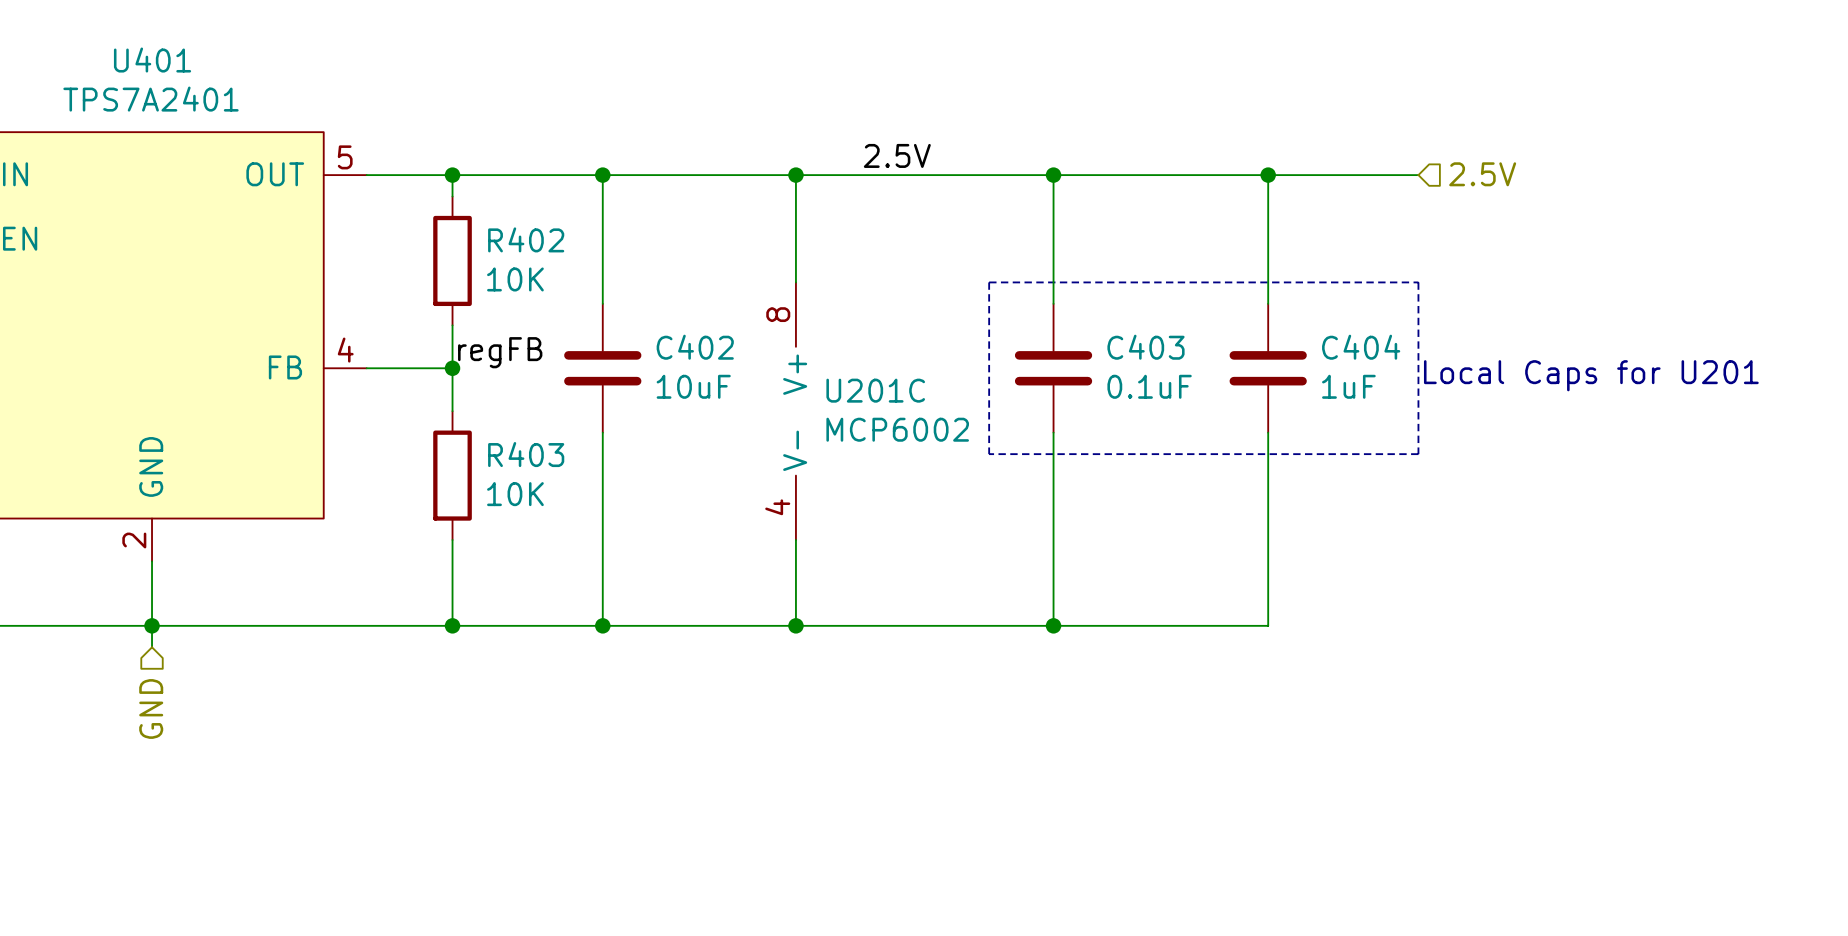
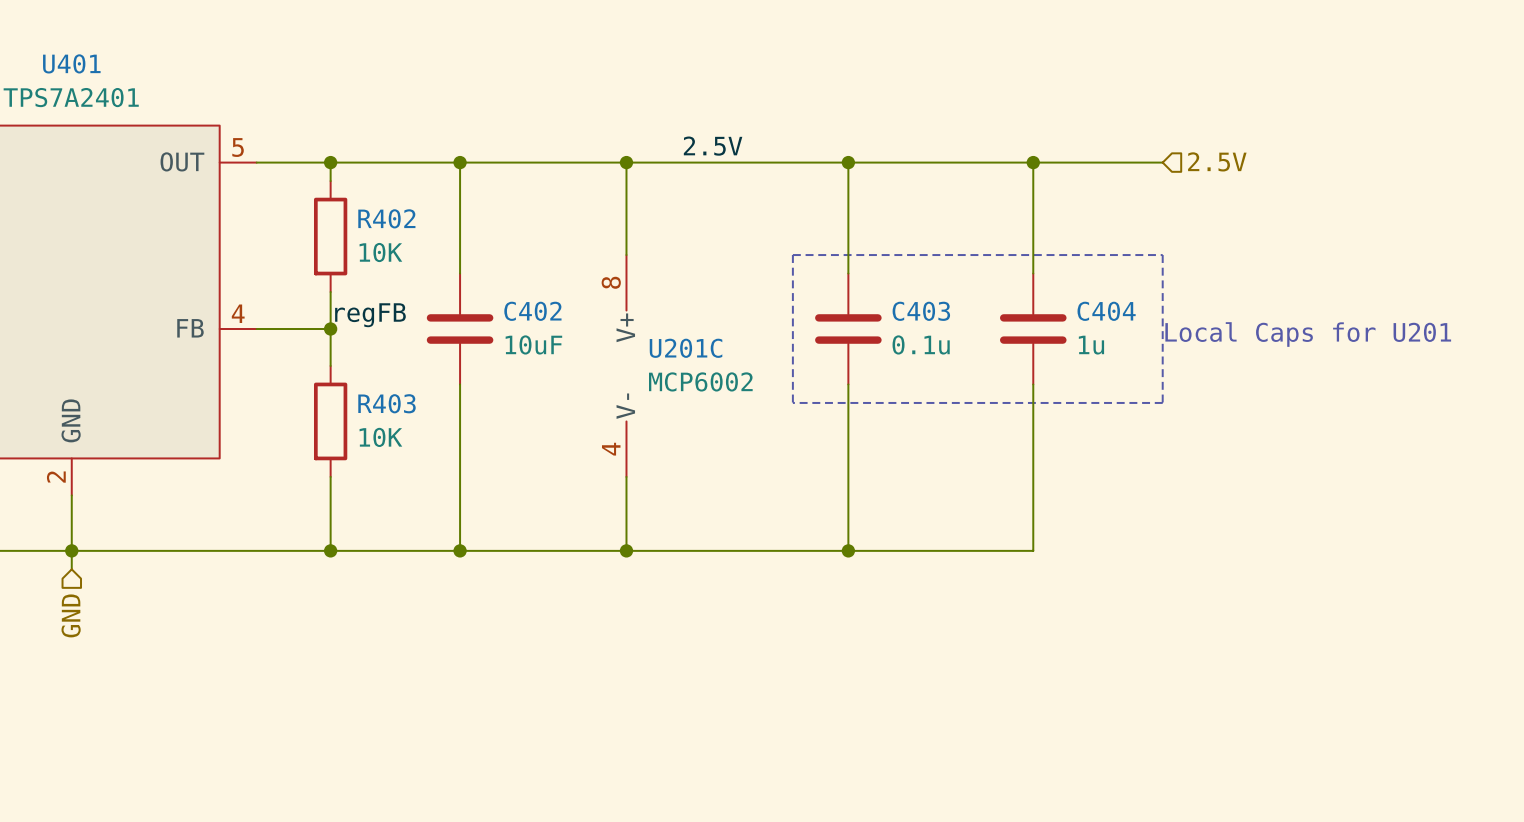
C403 value: 0.1uF (1149, 386) -> 0.1u (921, 344)
C404 value: 1uF (1348, 386) -> 1u (1091, 345)

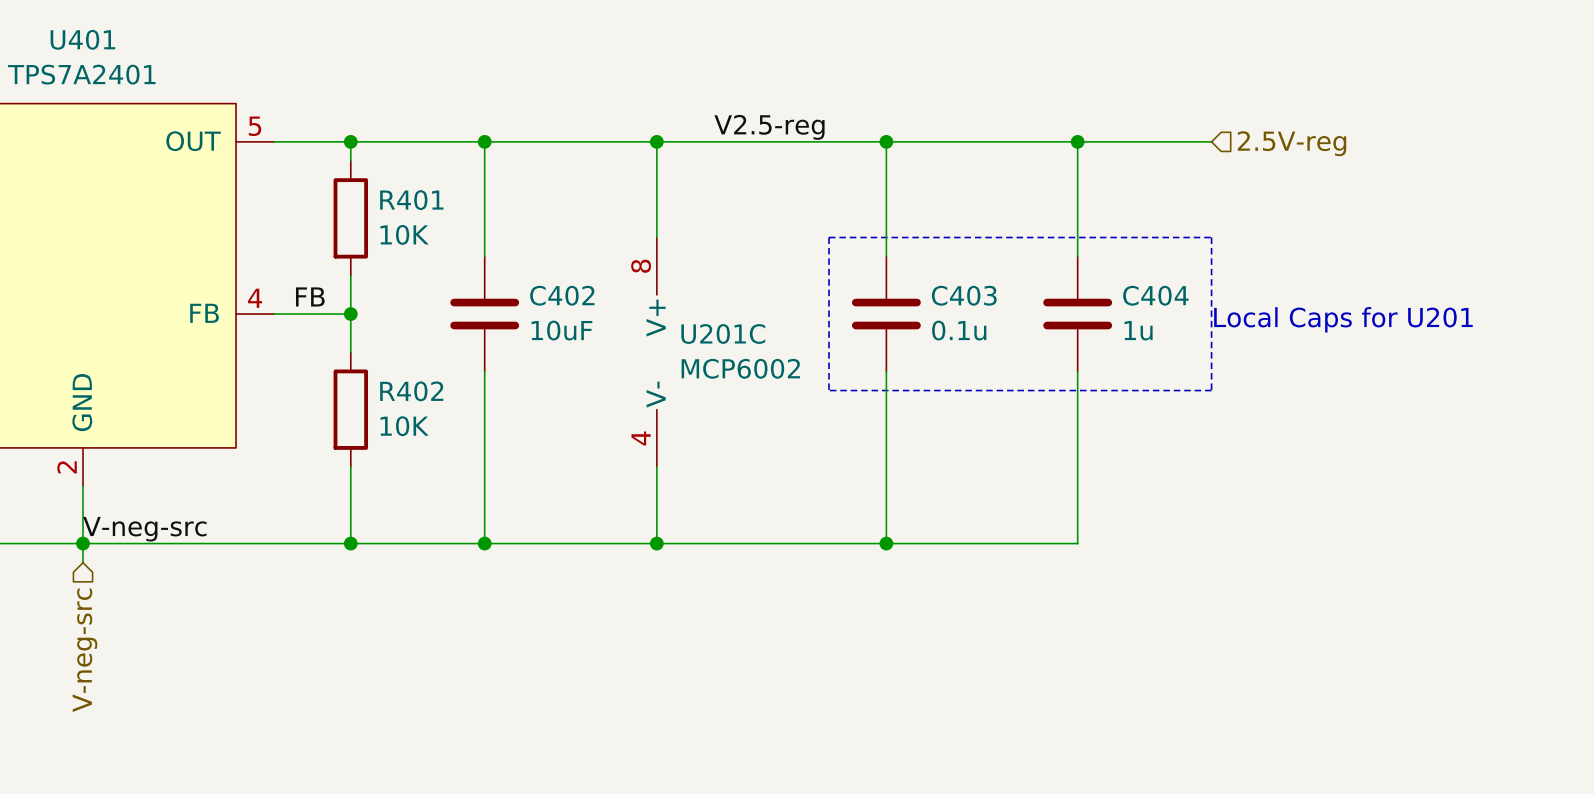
label: 2.5V (713, 146) -> V2.5-reg (769, 127)
hierarchical label: 2.5V (1217, 161) -> 2.5V-reg (1292, 143)
R402 name: R402 (386, 218) -> R401 (411, 200)
label: none -> FB (310, 296)
label: regFB (370, 315) -> none
R403 name: R403 (386, 403) -> R402 (411, 391)
label: none -> V-neg-src (144, 529)
hierarchical label: GND (71, 615) -> V-neg-src (85, 650)

